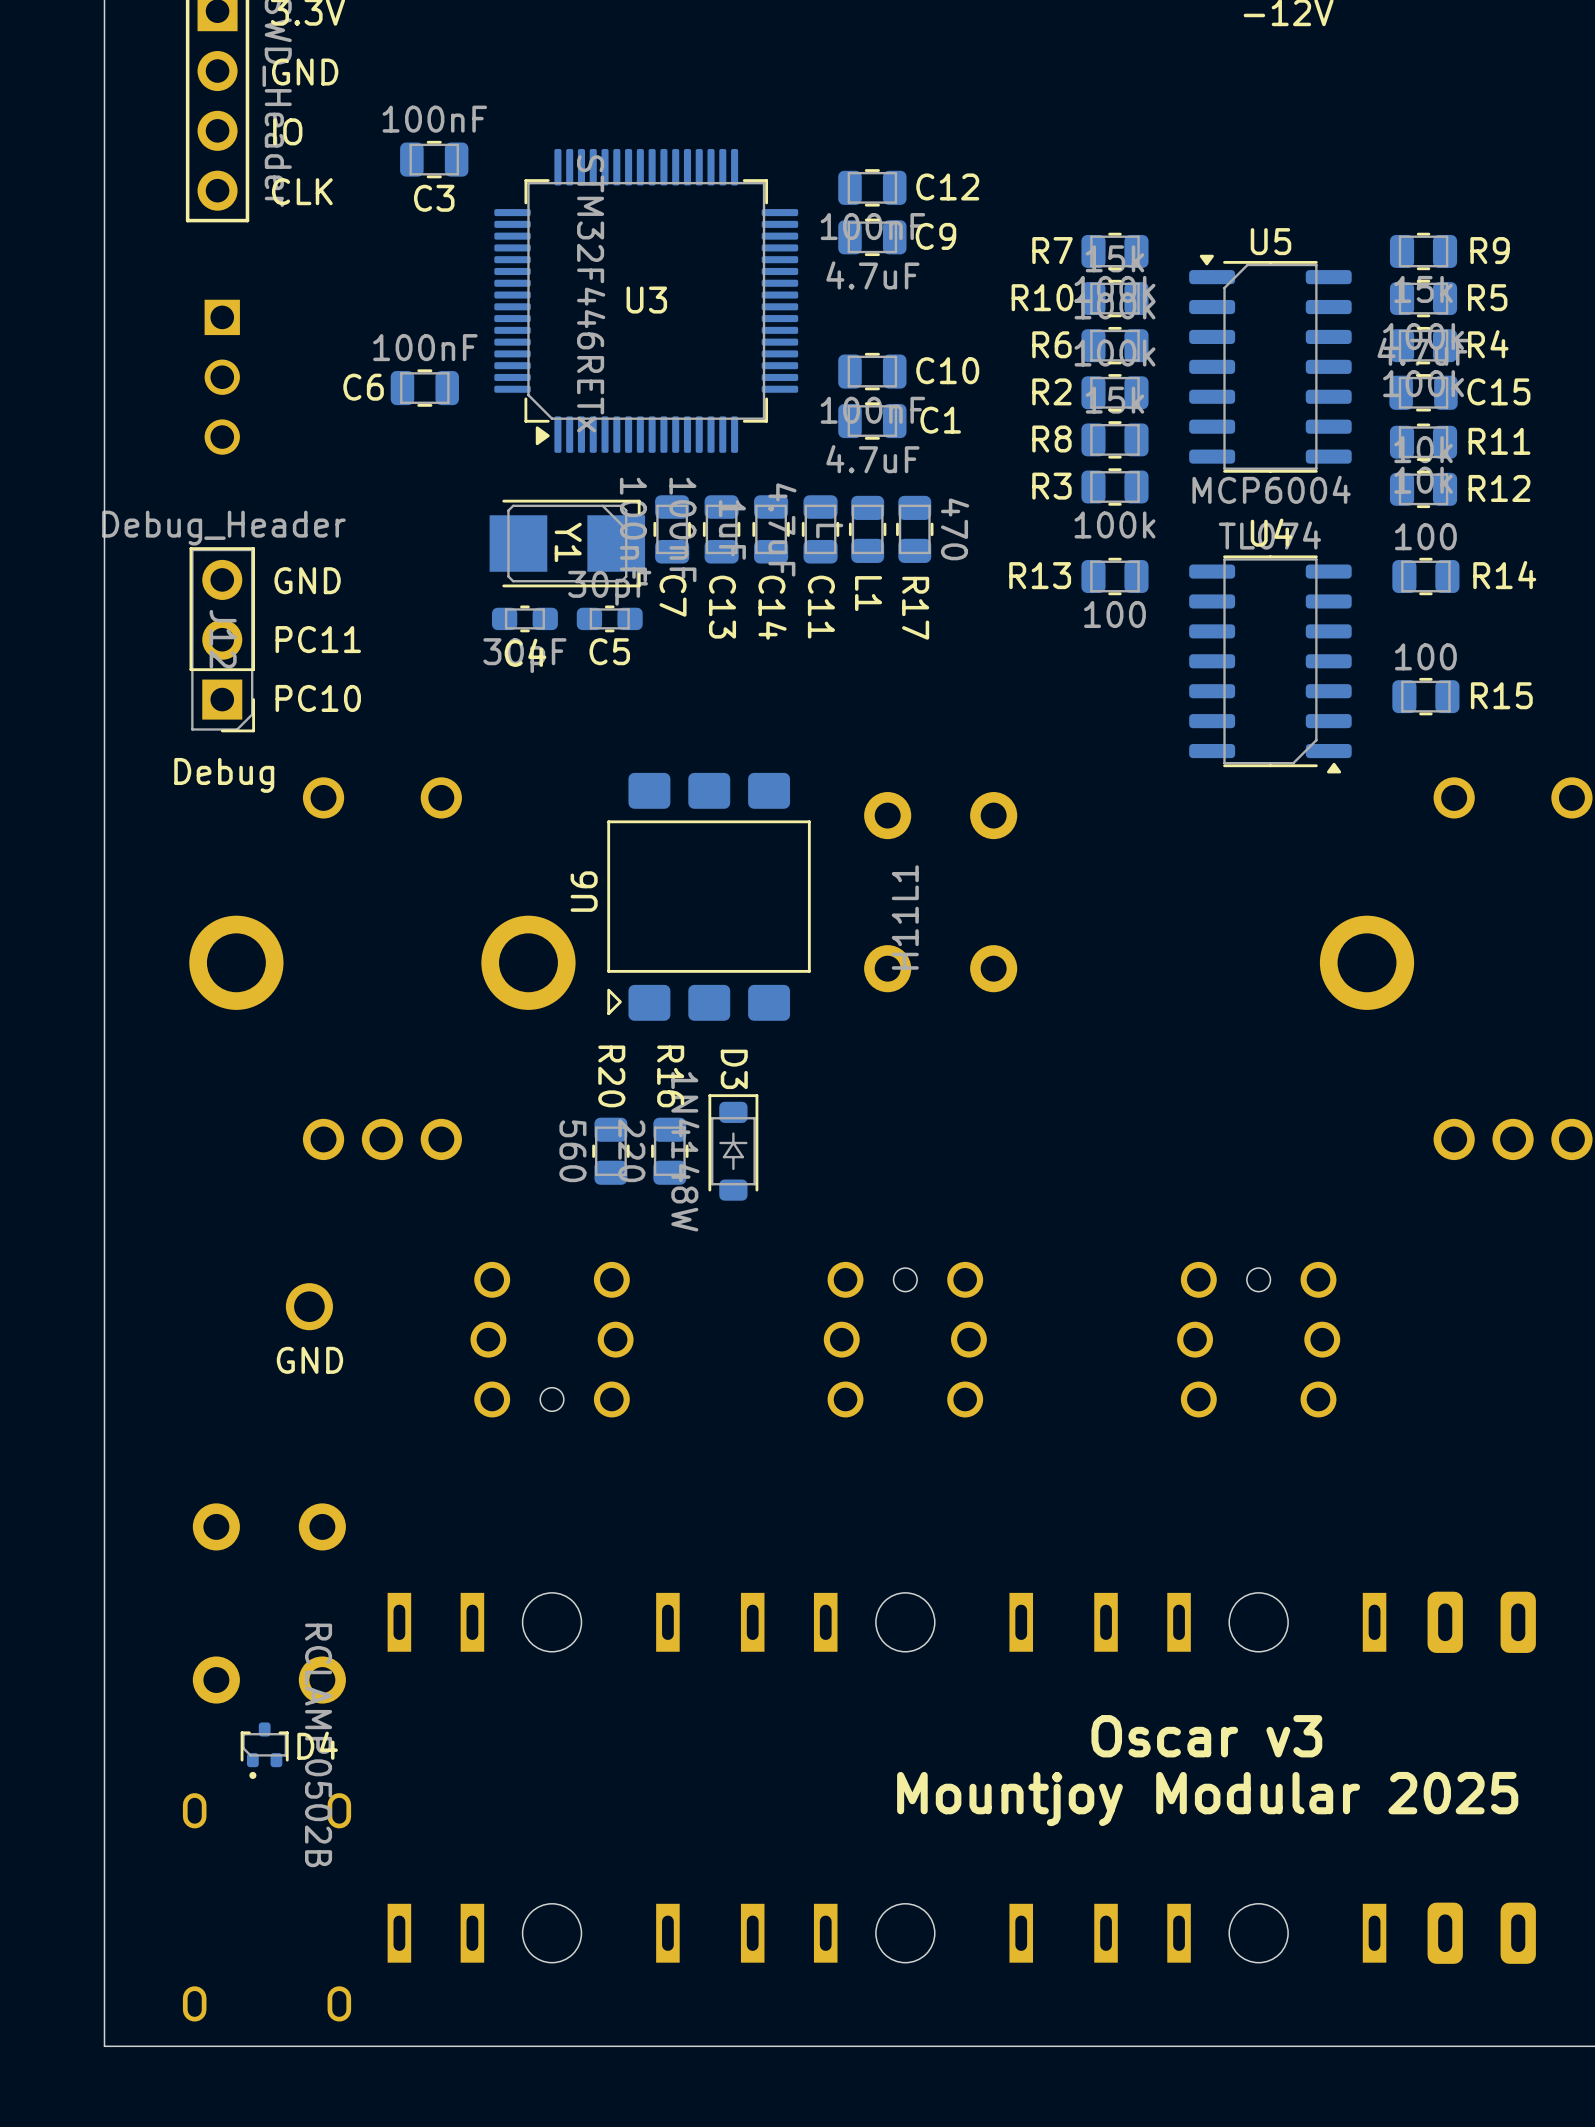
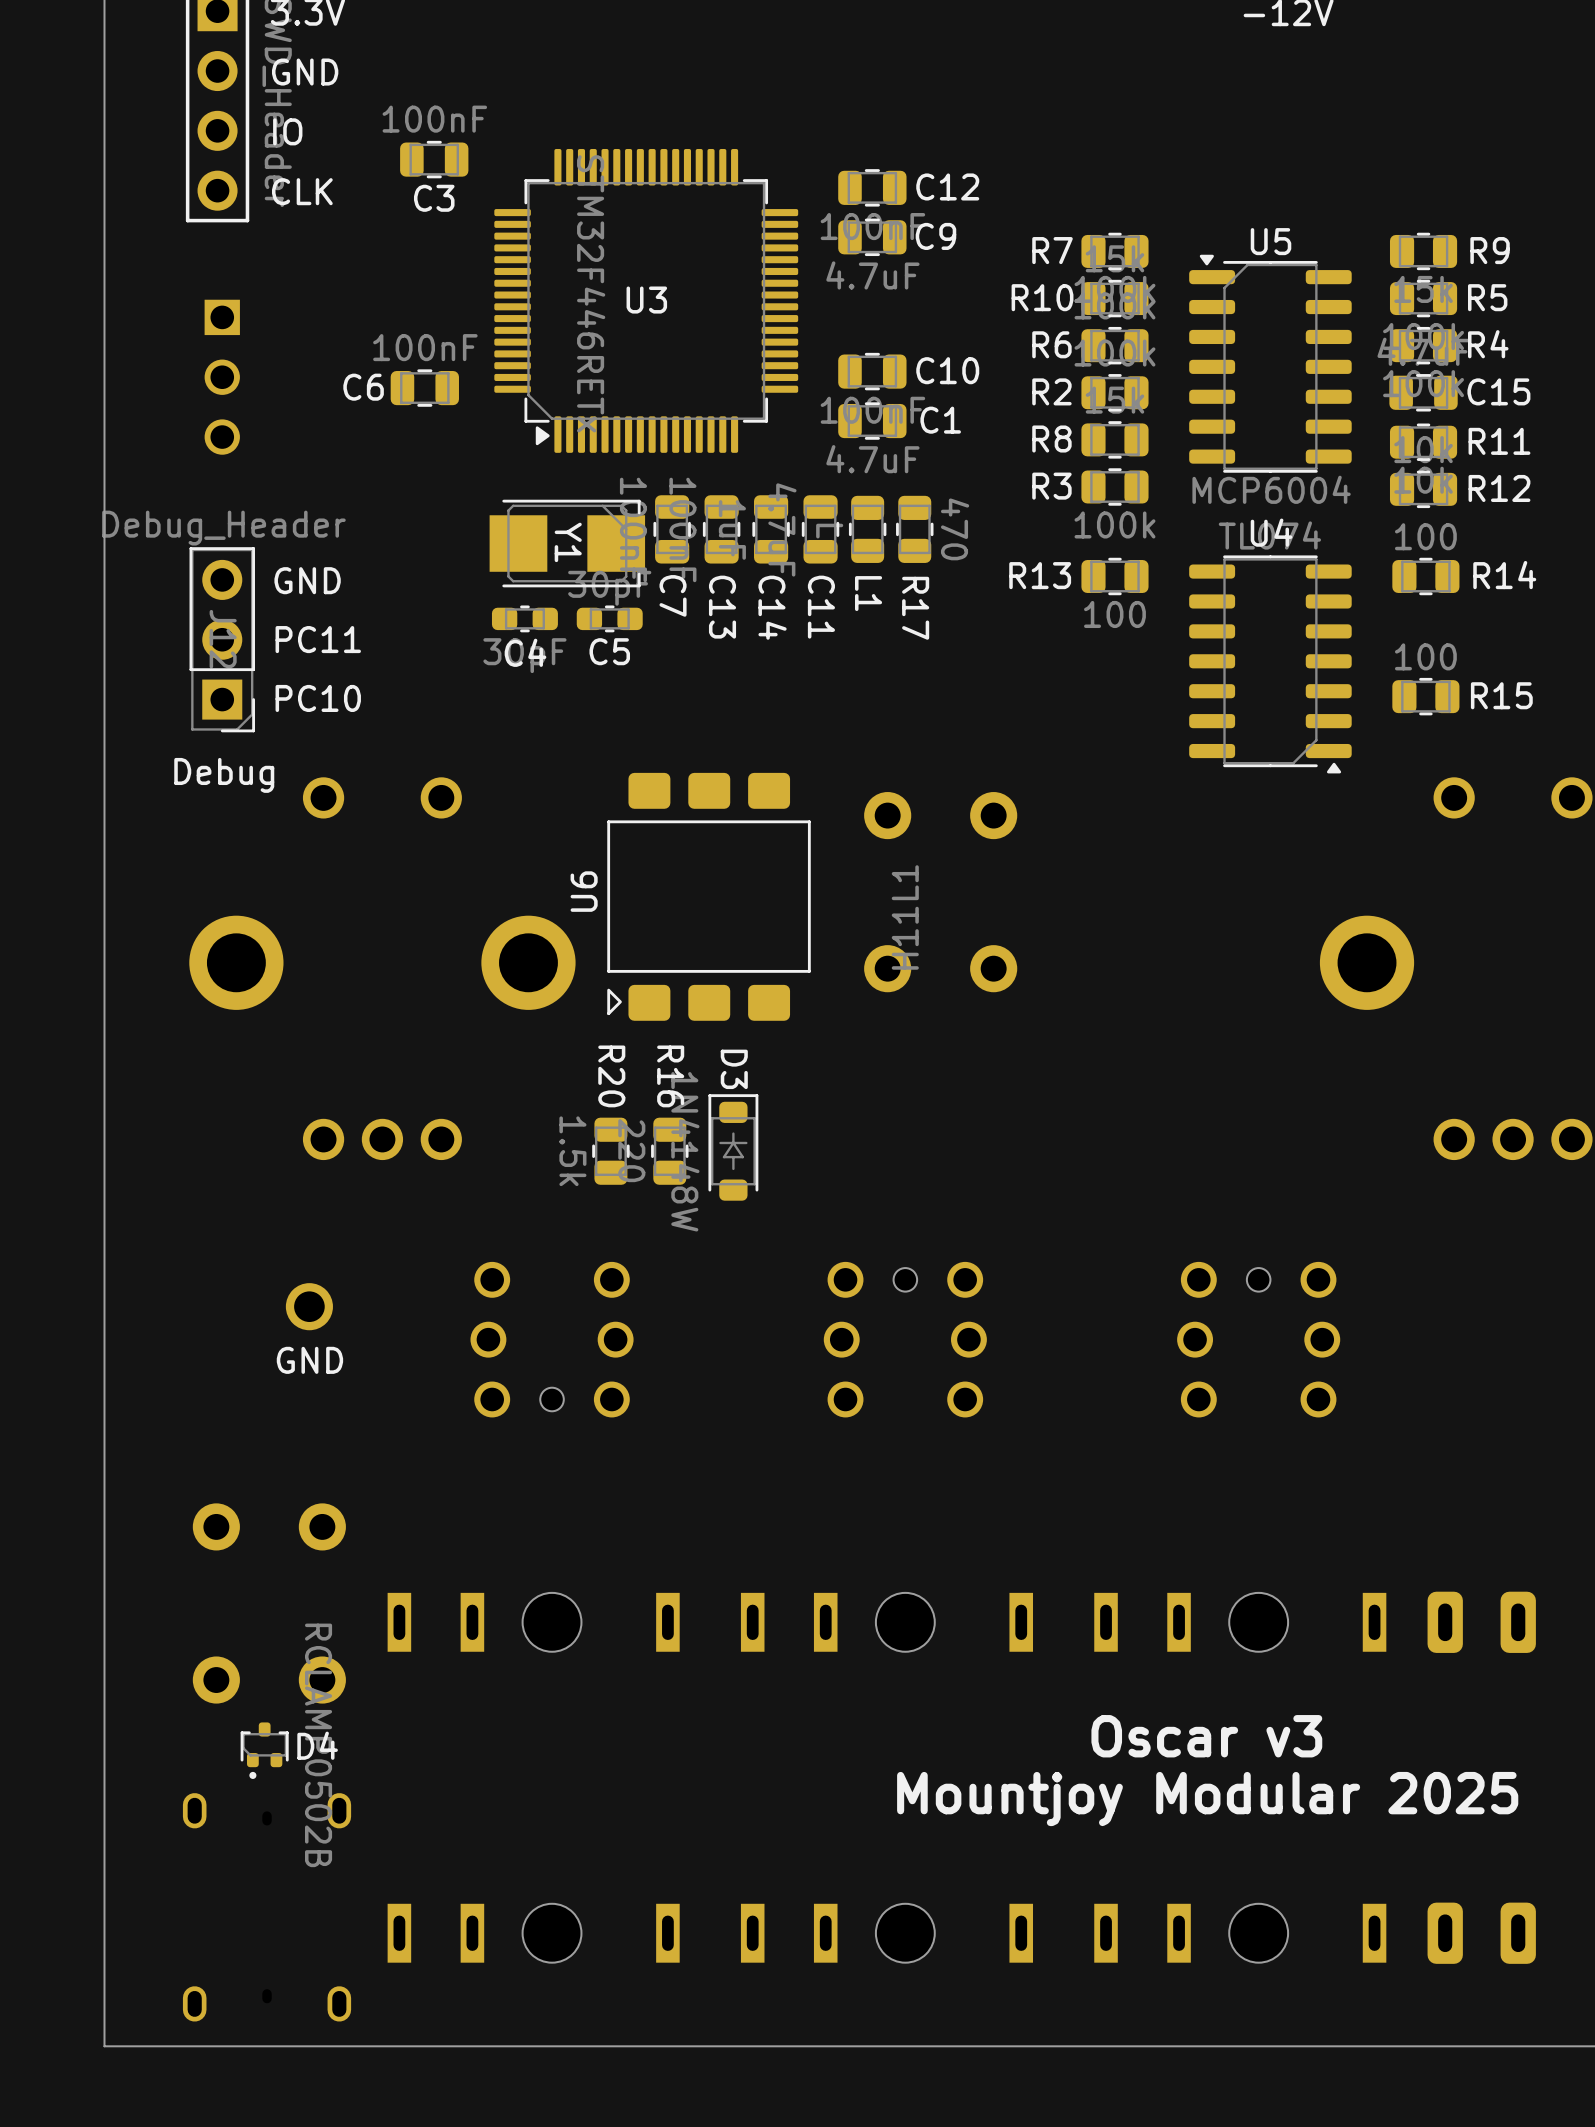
R20 value: 560 (572, 1151) -> 1.5k (572, 1151)

